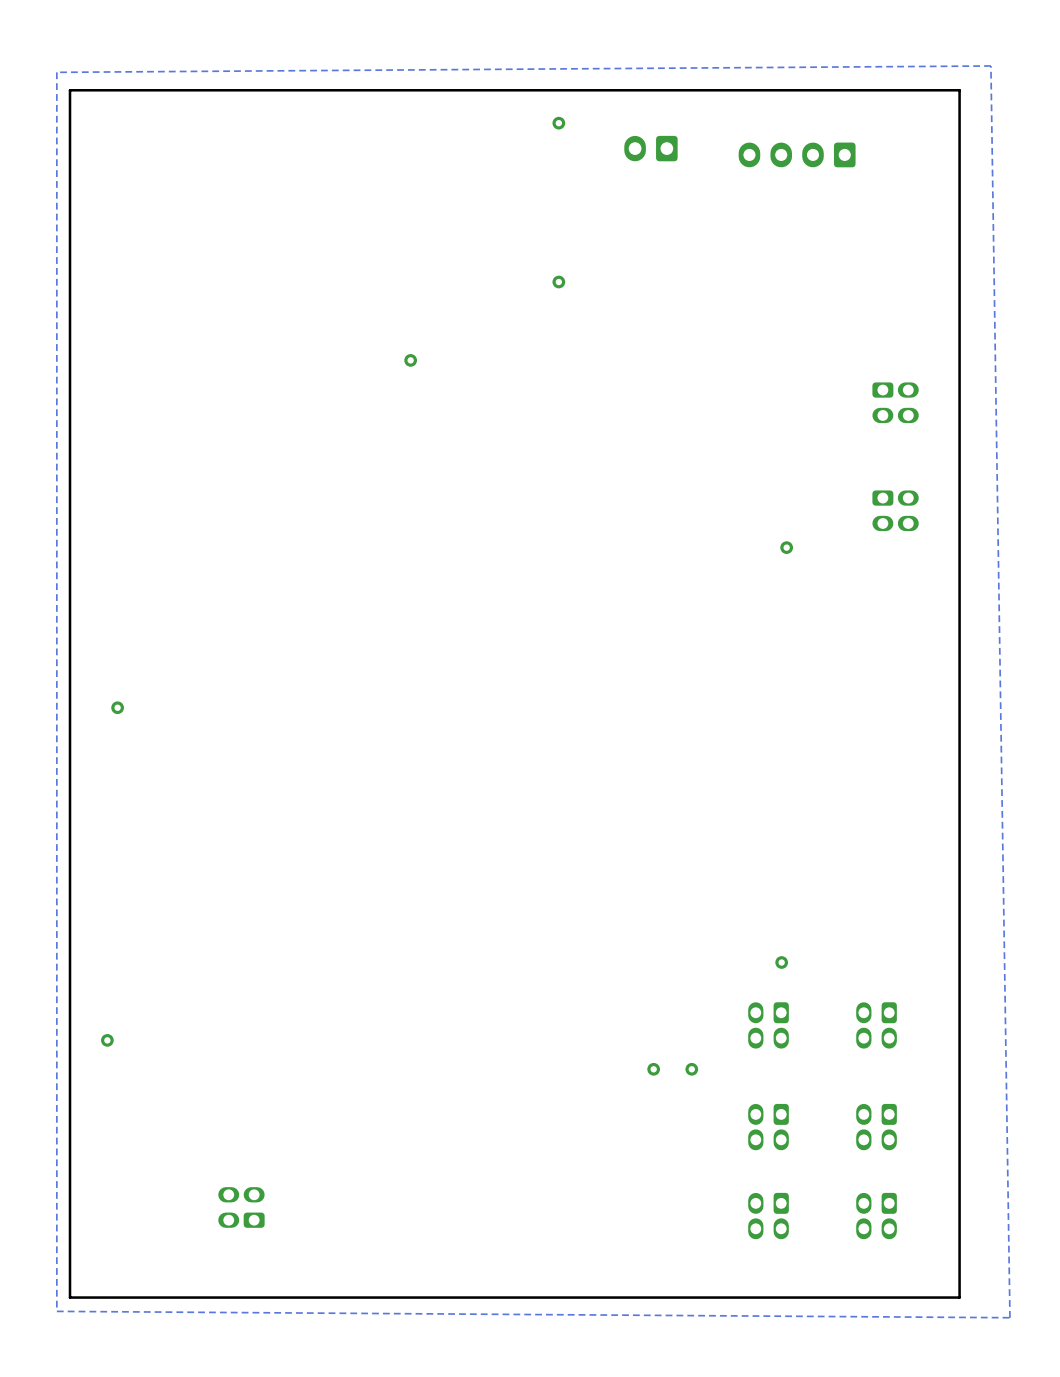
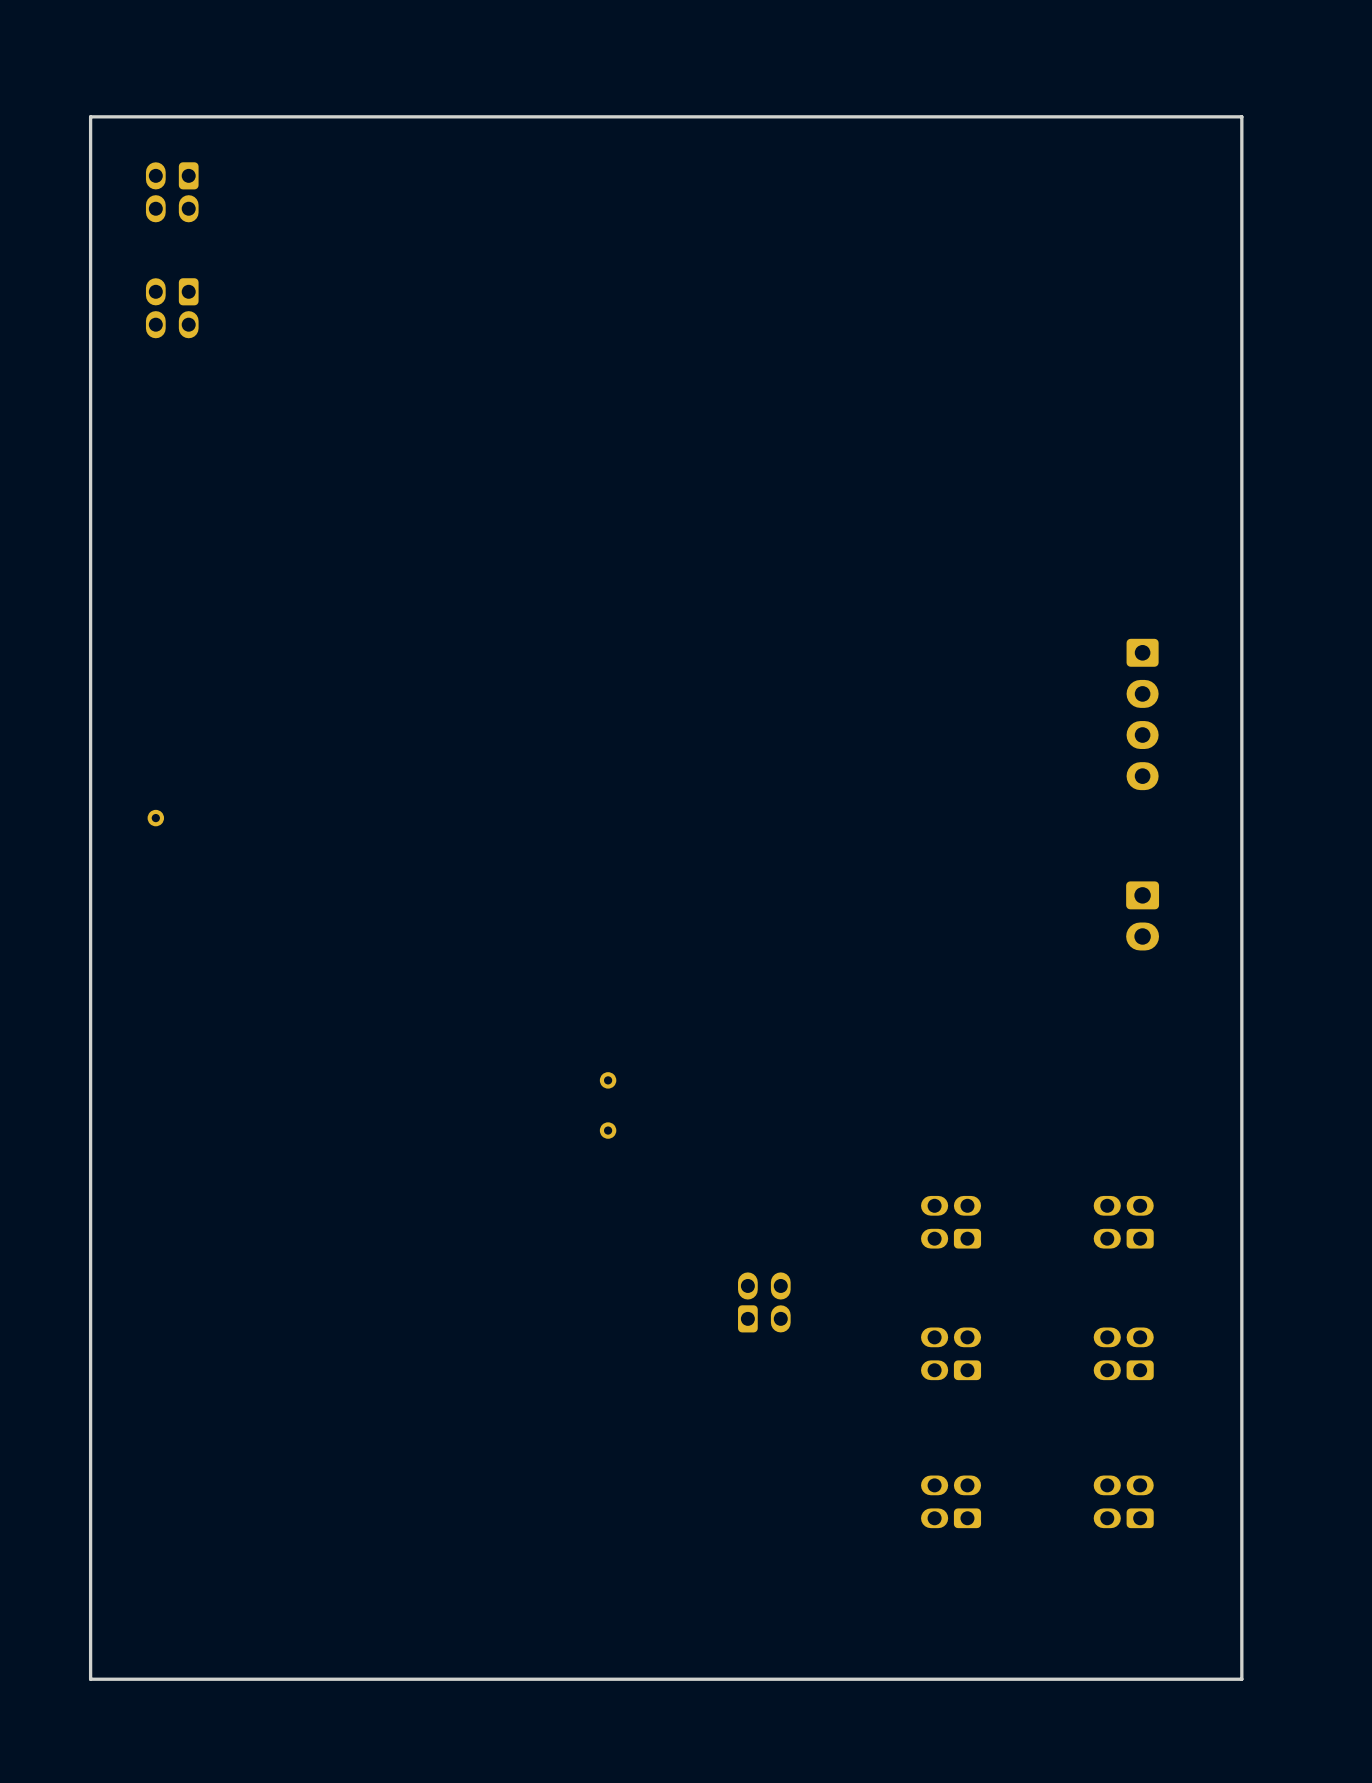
zone outline: (990, 65) (56, 72) (56, 1311) (1009, 1317) (990, 65) -> none
part: (558, 123) -> none
part: none -> (172, 192)
part: (650, 148) -> none
part: (797, 154) -> none
part: none -> (172, 308)
part: (558, 282) -> none
part: (410, 360) -> none
part: (895, 402) -> none
part: (895, 510) -> none
part: (786, 547) -> none
part: none -> (1142, 714)
part position: (117, 707) -> (155, 818)
part: none -> (1142, 915)
part: none -> (608, 1080)
part: none -> (608, 1130)
part: none -> (951, 1222)
part: none -> (1123, 1222)
part: (781, 962) -> none
part: none -> (764, 1302)
part rotation: 0° (768, 1025) -> 90° clockwise (951, 1353)
part position: (768, 1025) -> (951, 1353)
part rotation: 0° (876, 1025) -> 90° clockwise (1123, 1353)
part: (107, 1040) -> none
part: (653, 1069) -> none
part: (691, 1069) -> none
part: (768, 1127) -> none
part: (876, 1127) -> none
part: none -> (951, 1501)
part: none -> (1123, 1501)
part: (241, 1207) -> none
part: (768, 1216) -> none
part: (876, 1216) -> none

